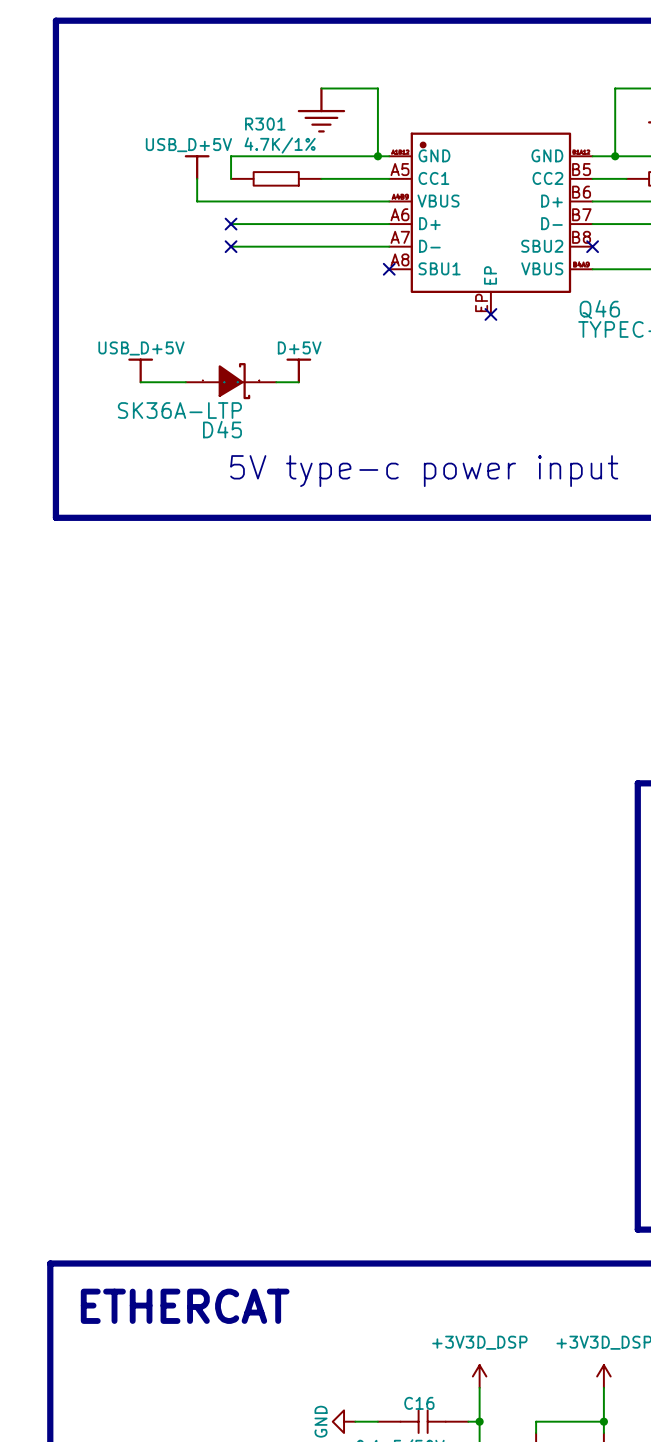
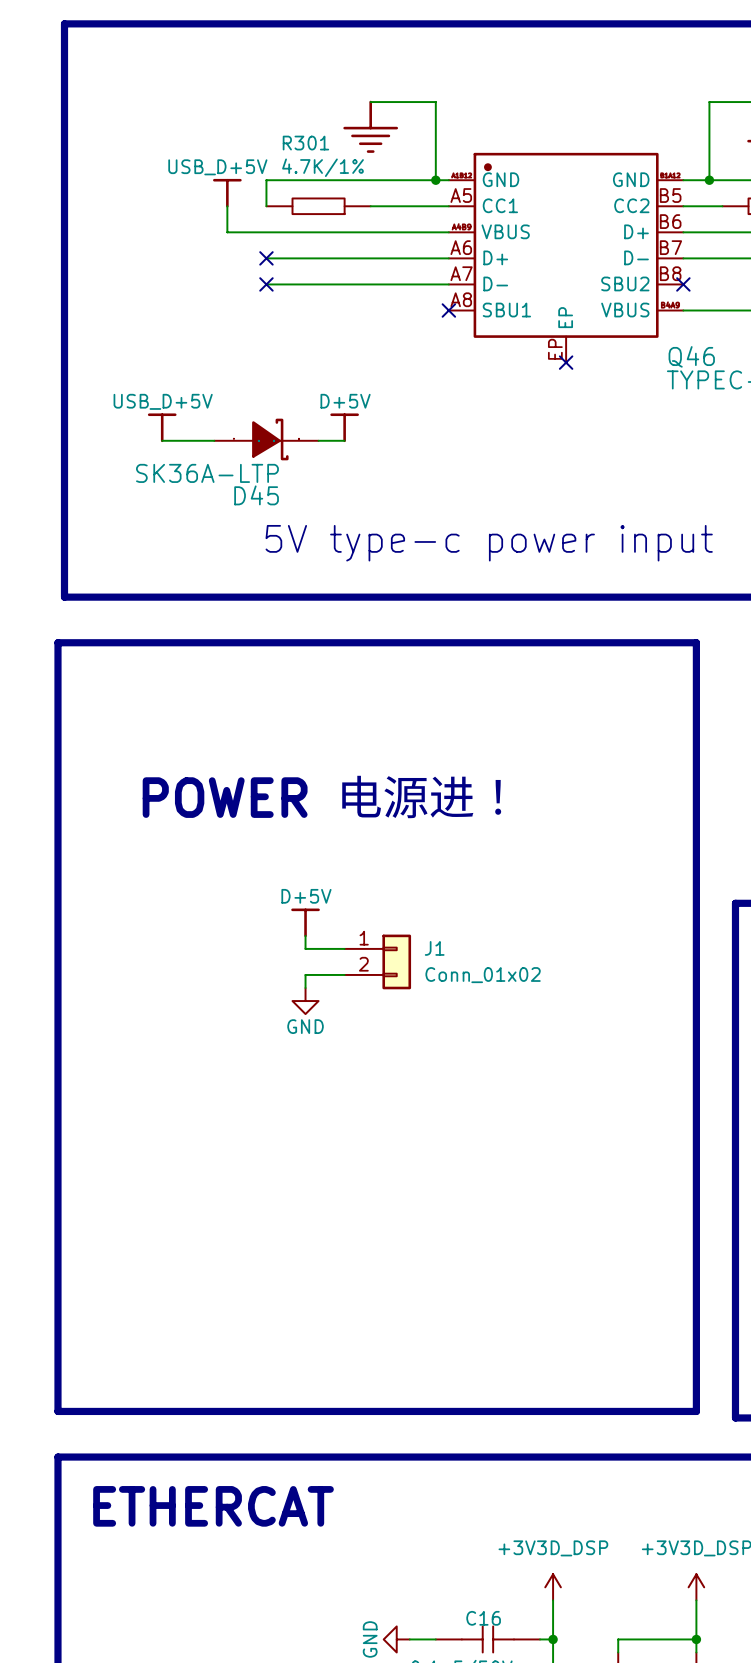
line: none -> (57, 642) (696, 642) (696, 1411) (57, 1411) (57, 642)
text: none -> POWER 电源进！ (323, 797)
power symbol: none -> D+5V (305, 922)
wire: none -> (305, 935) (305, 948) (344, 948)
J1: none -> Conn_01x02 (377, 961)
wire: none -> (344, 974) (305, 974) (305, 988)
power symbol: none -> GND (305, 1001)

